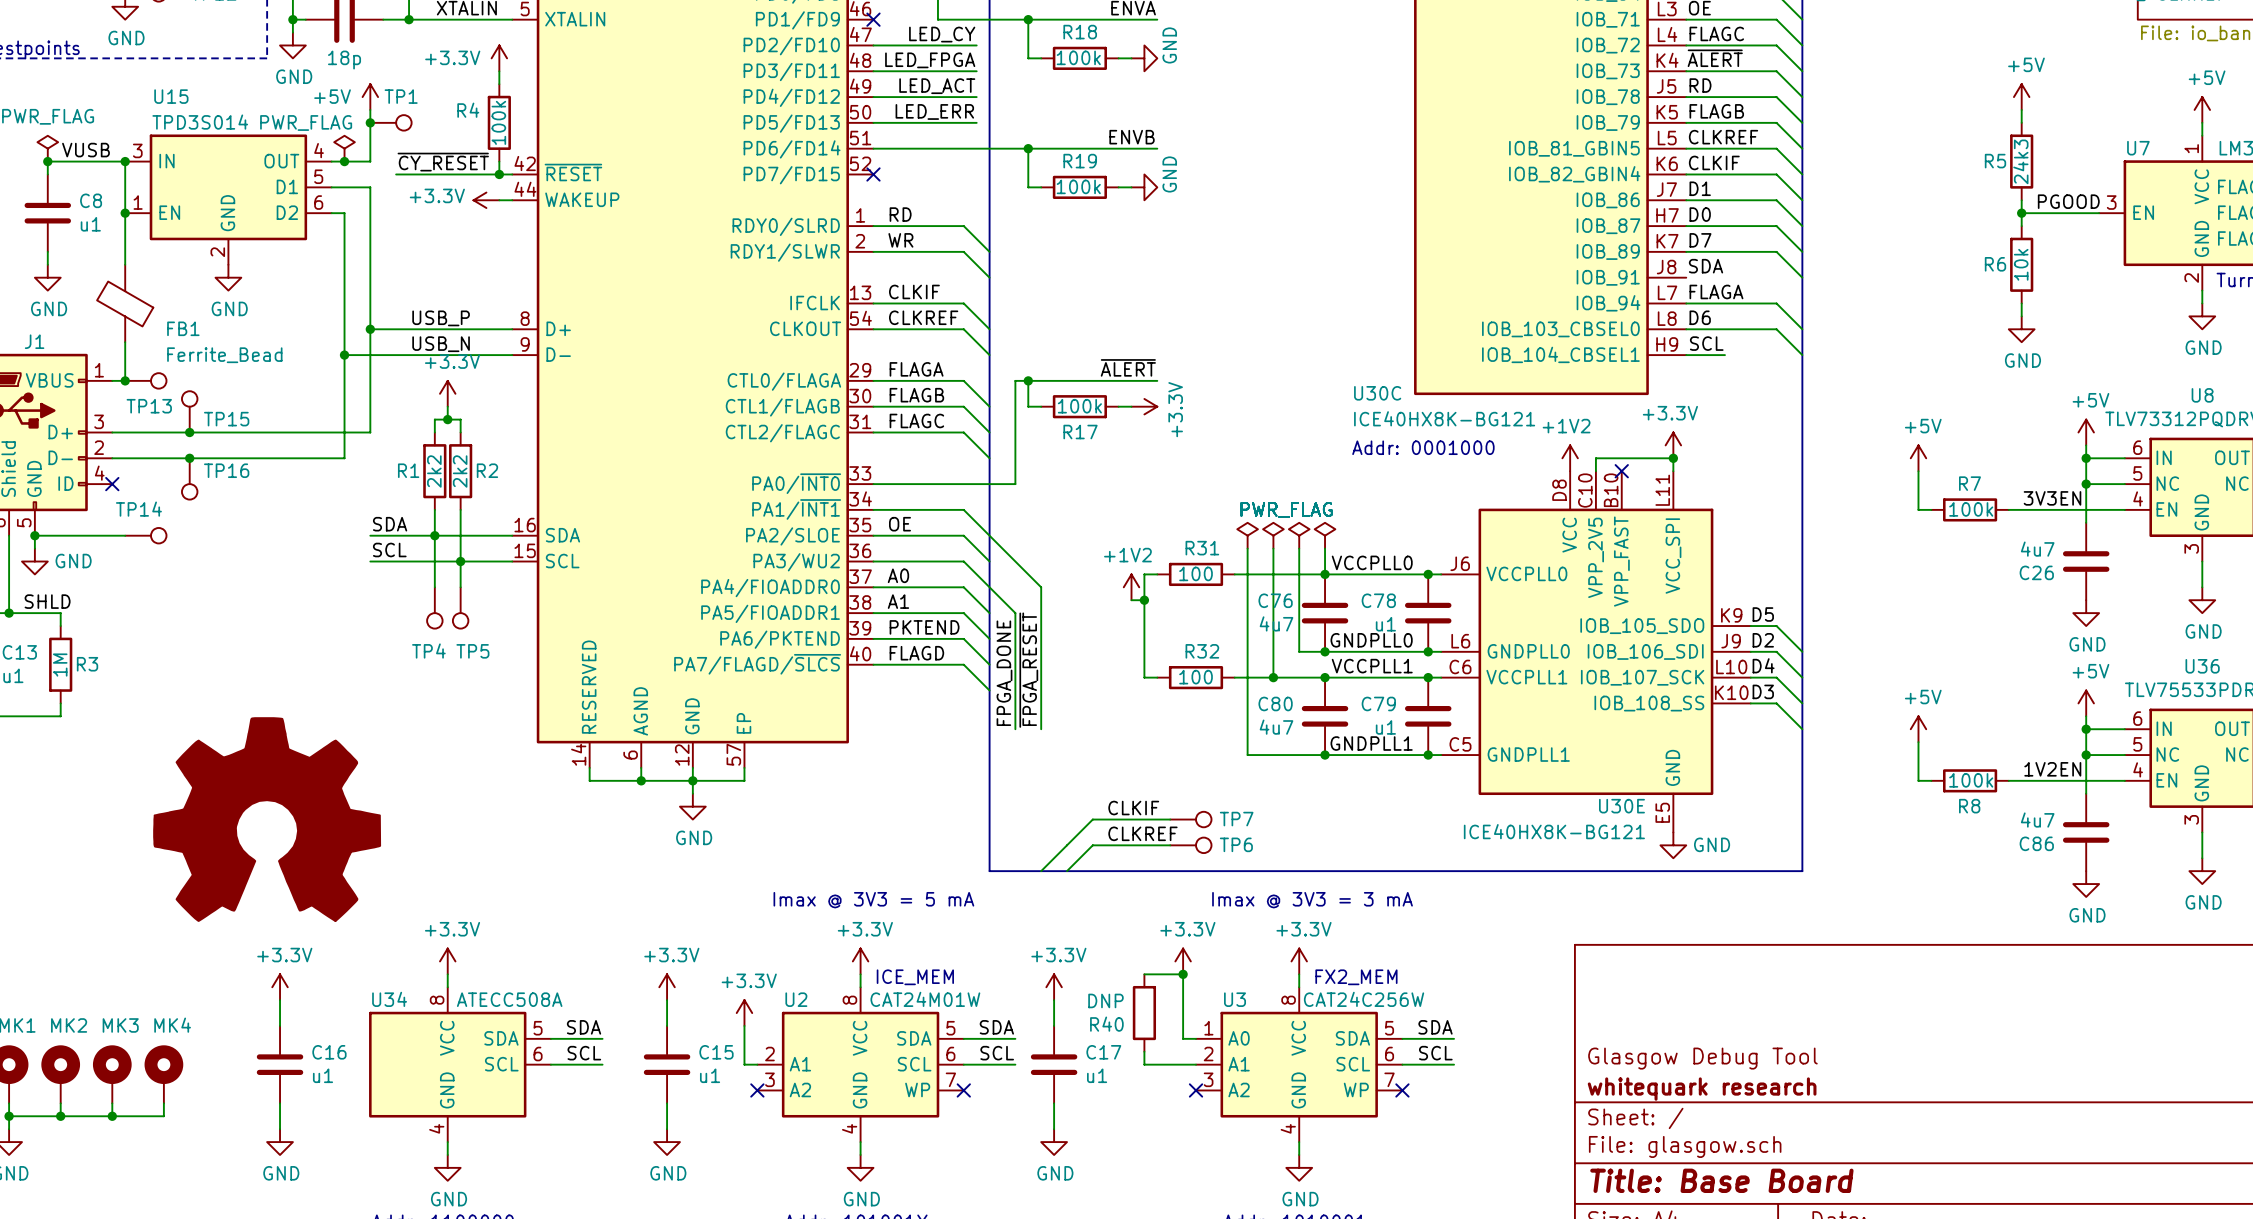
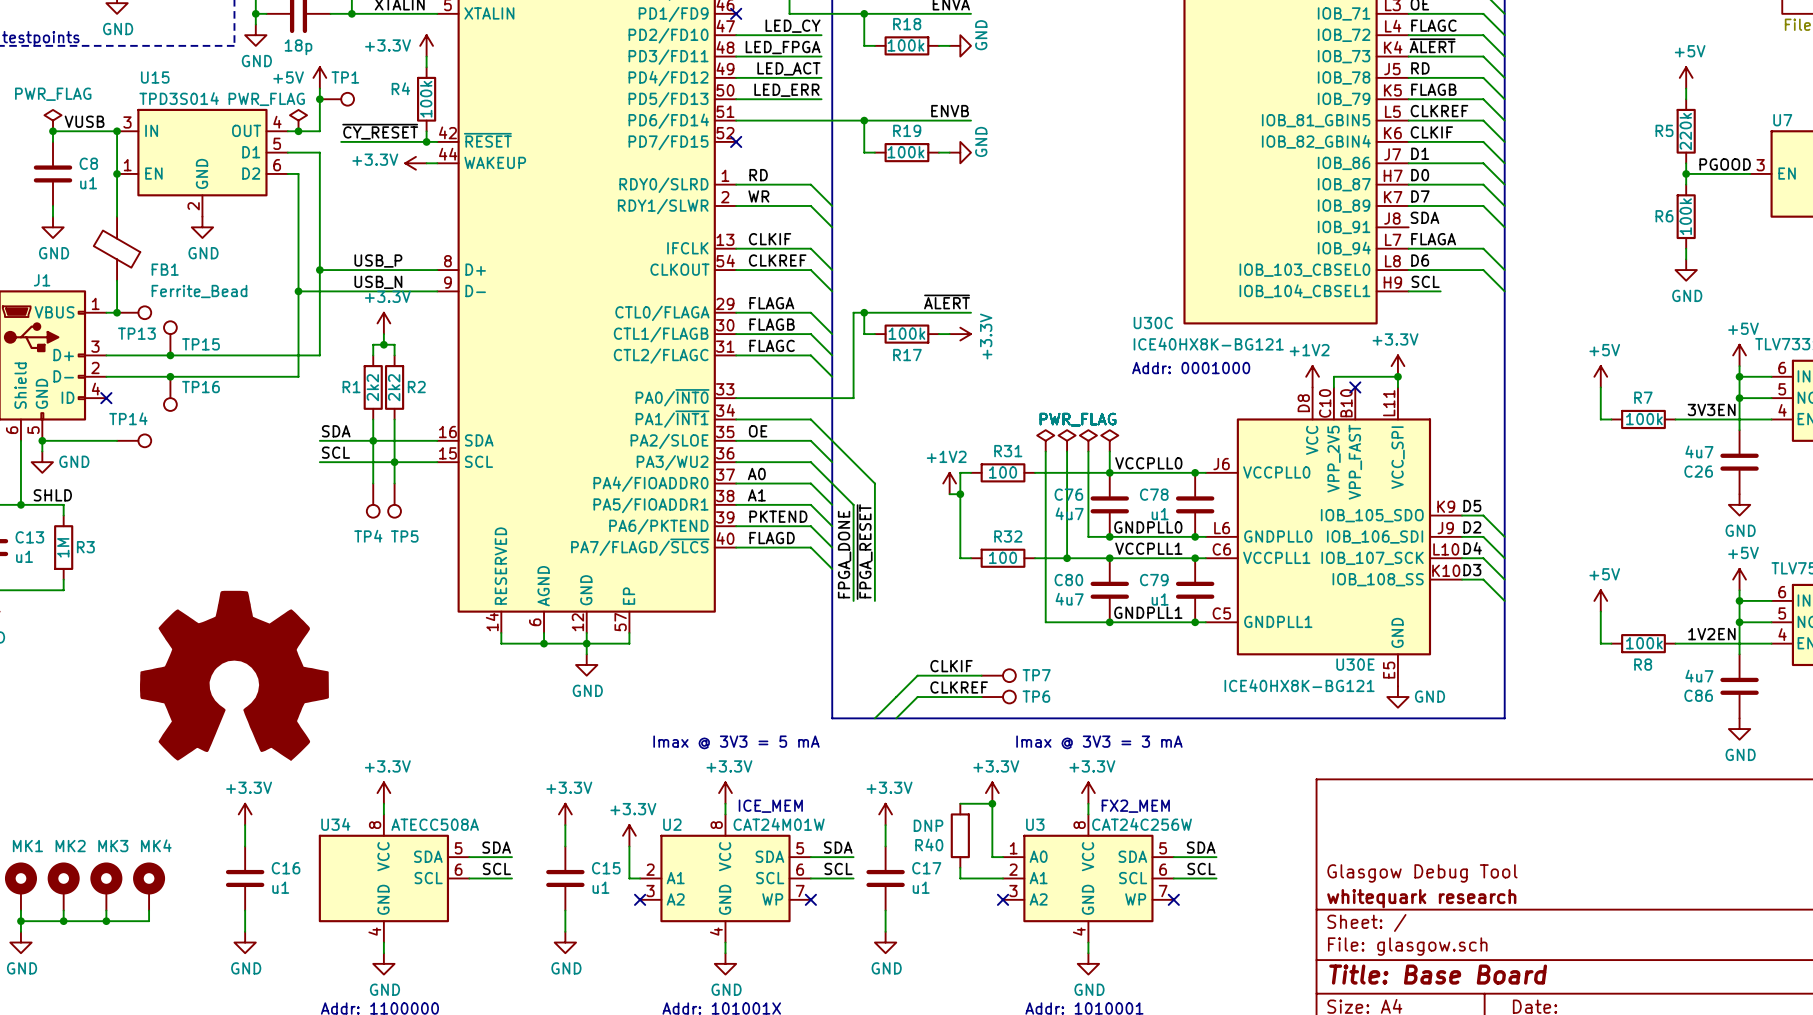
R5 value: 24k3 (2020, 161) -> 220k (1685, 131)
R6 value: 10k (2021, 264) -> 100k (1685, 216)

